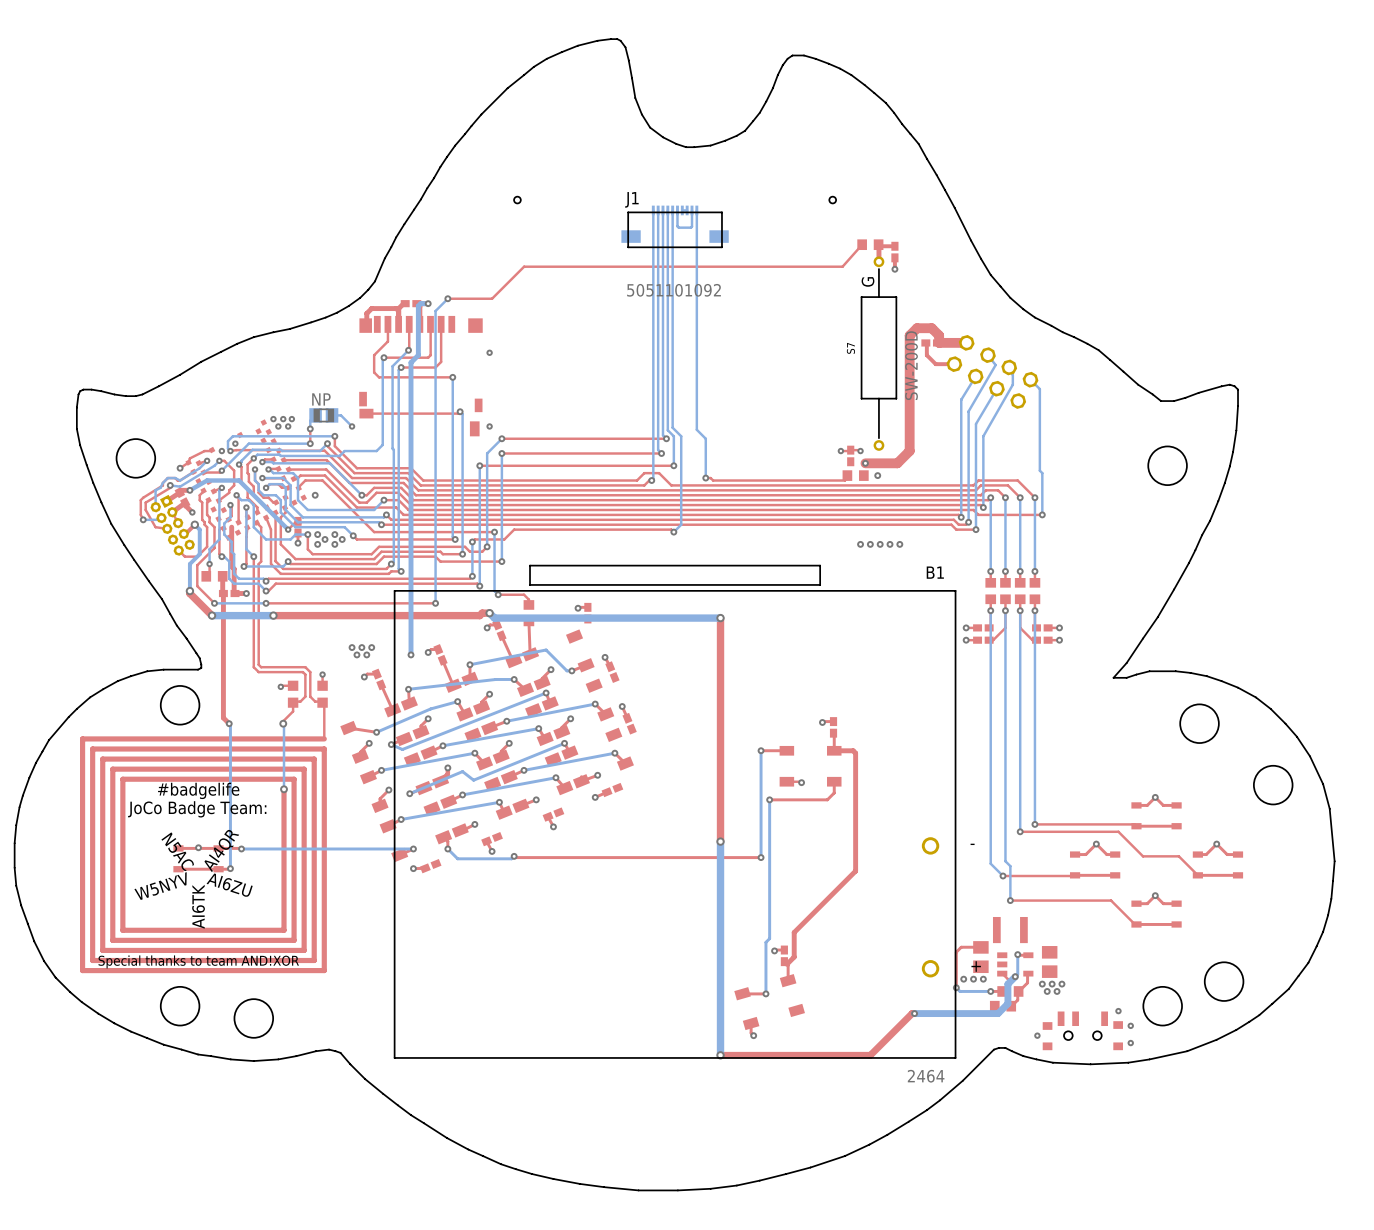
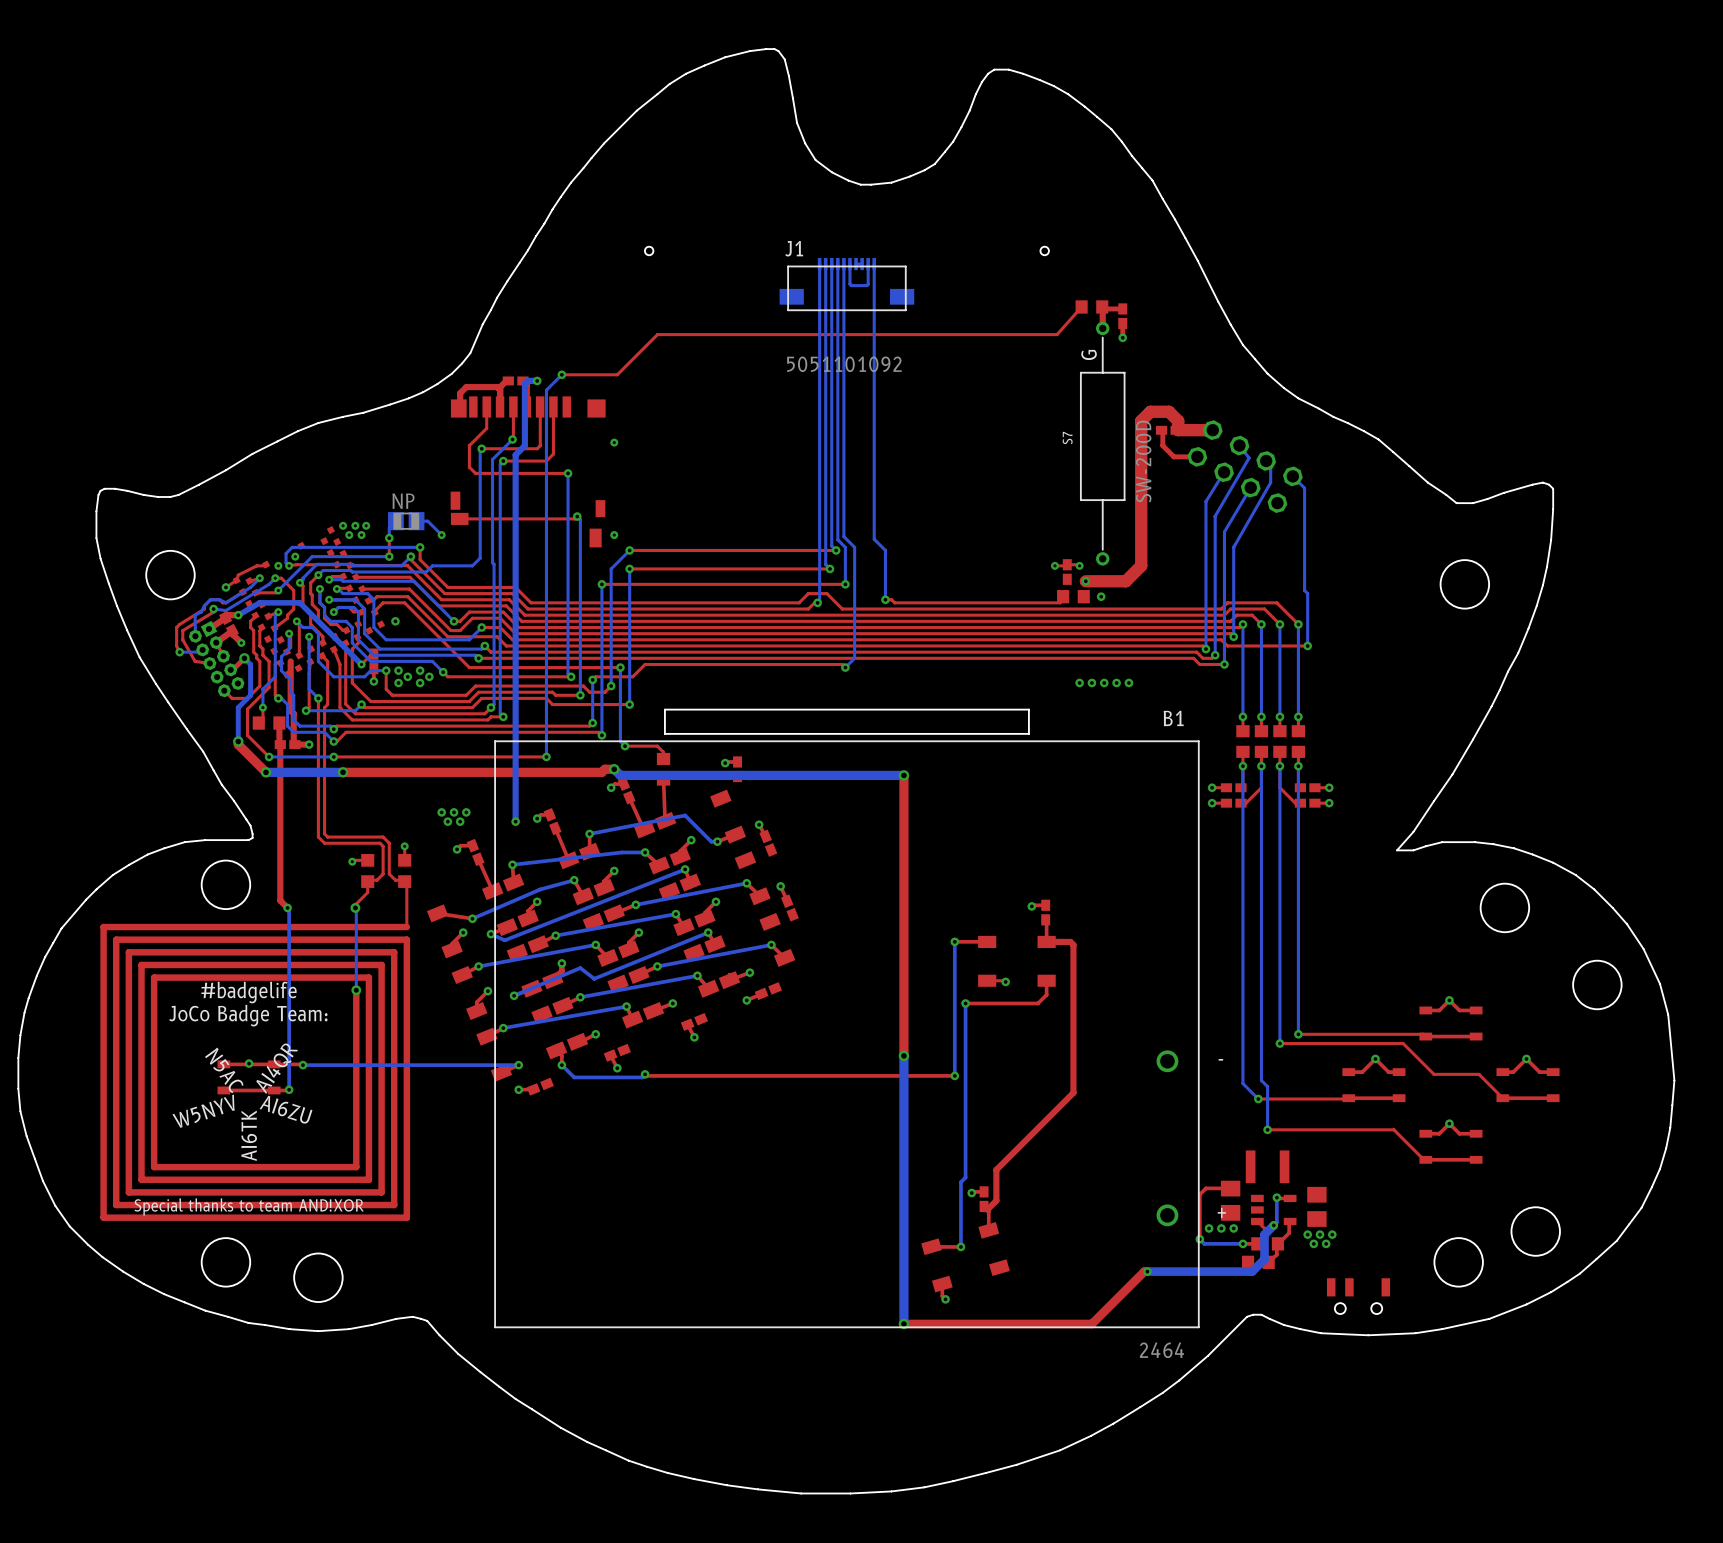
part footprint: [1042, 1011, 1123, 1051] -> [1326, 1278, 1391, 1315]
via: (1118, 1011) -> none
via: (1130, 1025) -> none
via: (1037, 1035) -> none
via: (1130, 1043) -> none

